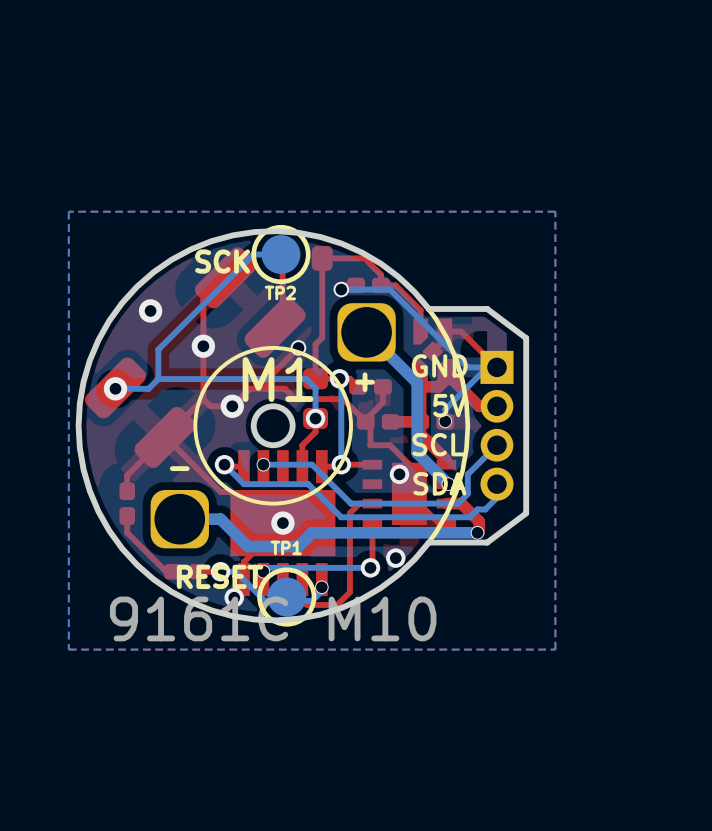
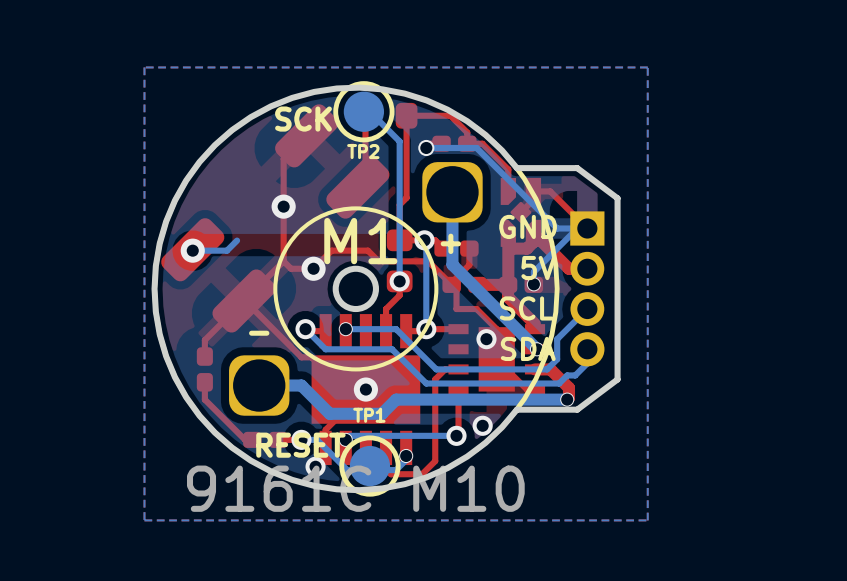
bottom track: (280, 254) (253, 254) (158, 349) (158, 379) (306, 379) (315, 388) -> (365, 107) (399, 141) (399, 250)
via: (150, 310) -> none
bottom track: (366, 332) (417, 382) (417, 453) -> (452, 192) (452, 264) (504, 317)
top track: (298, 347) (267, 379) (267, 388) -> none
via: (298, 347) -> none

